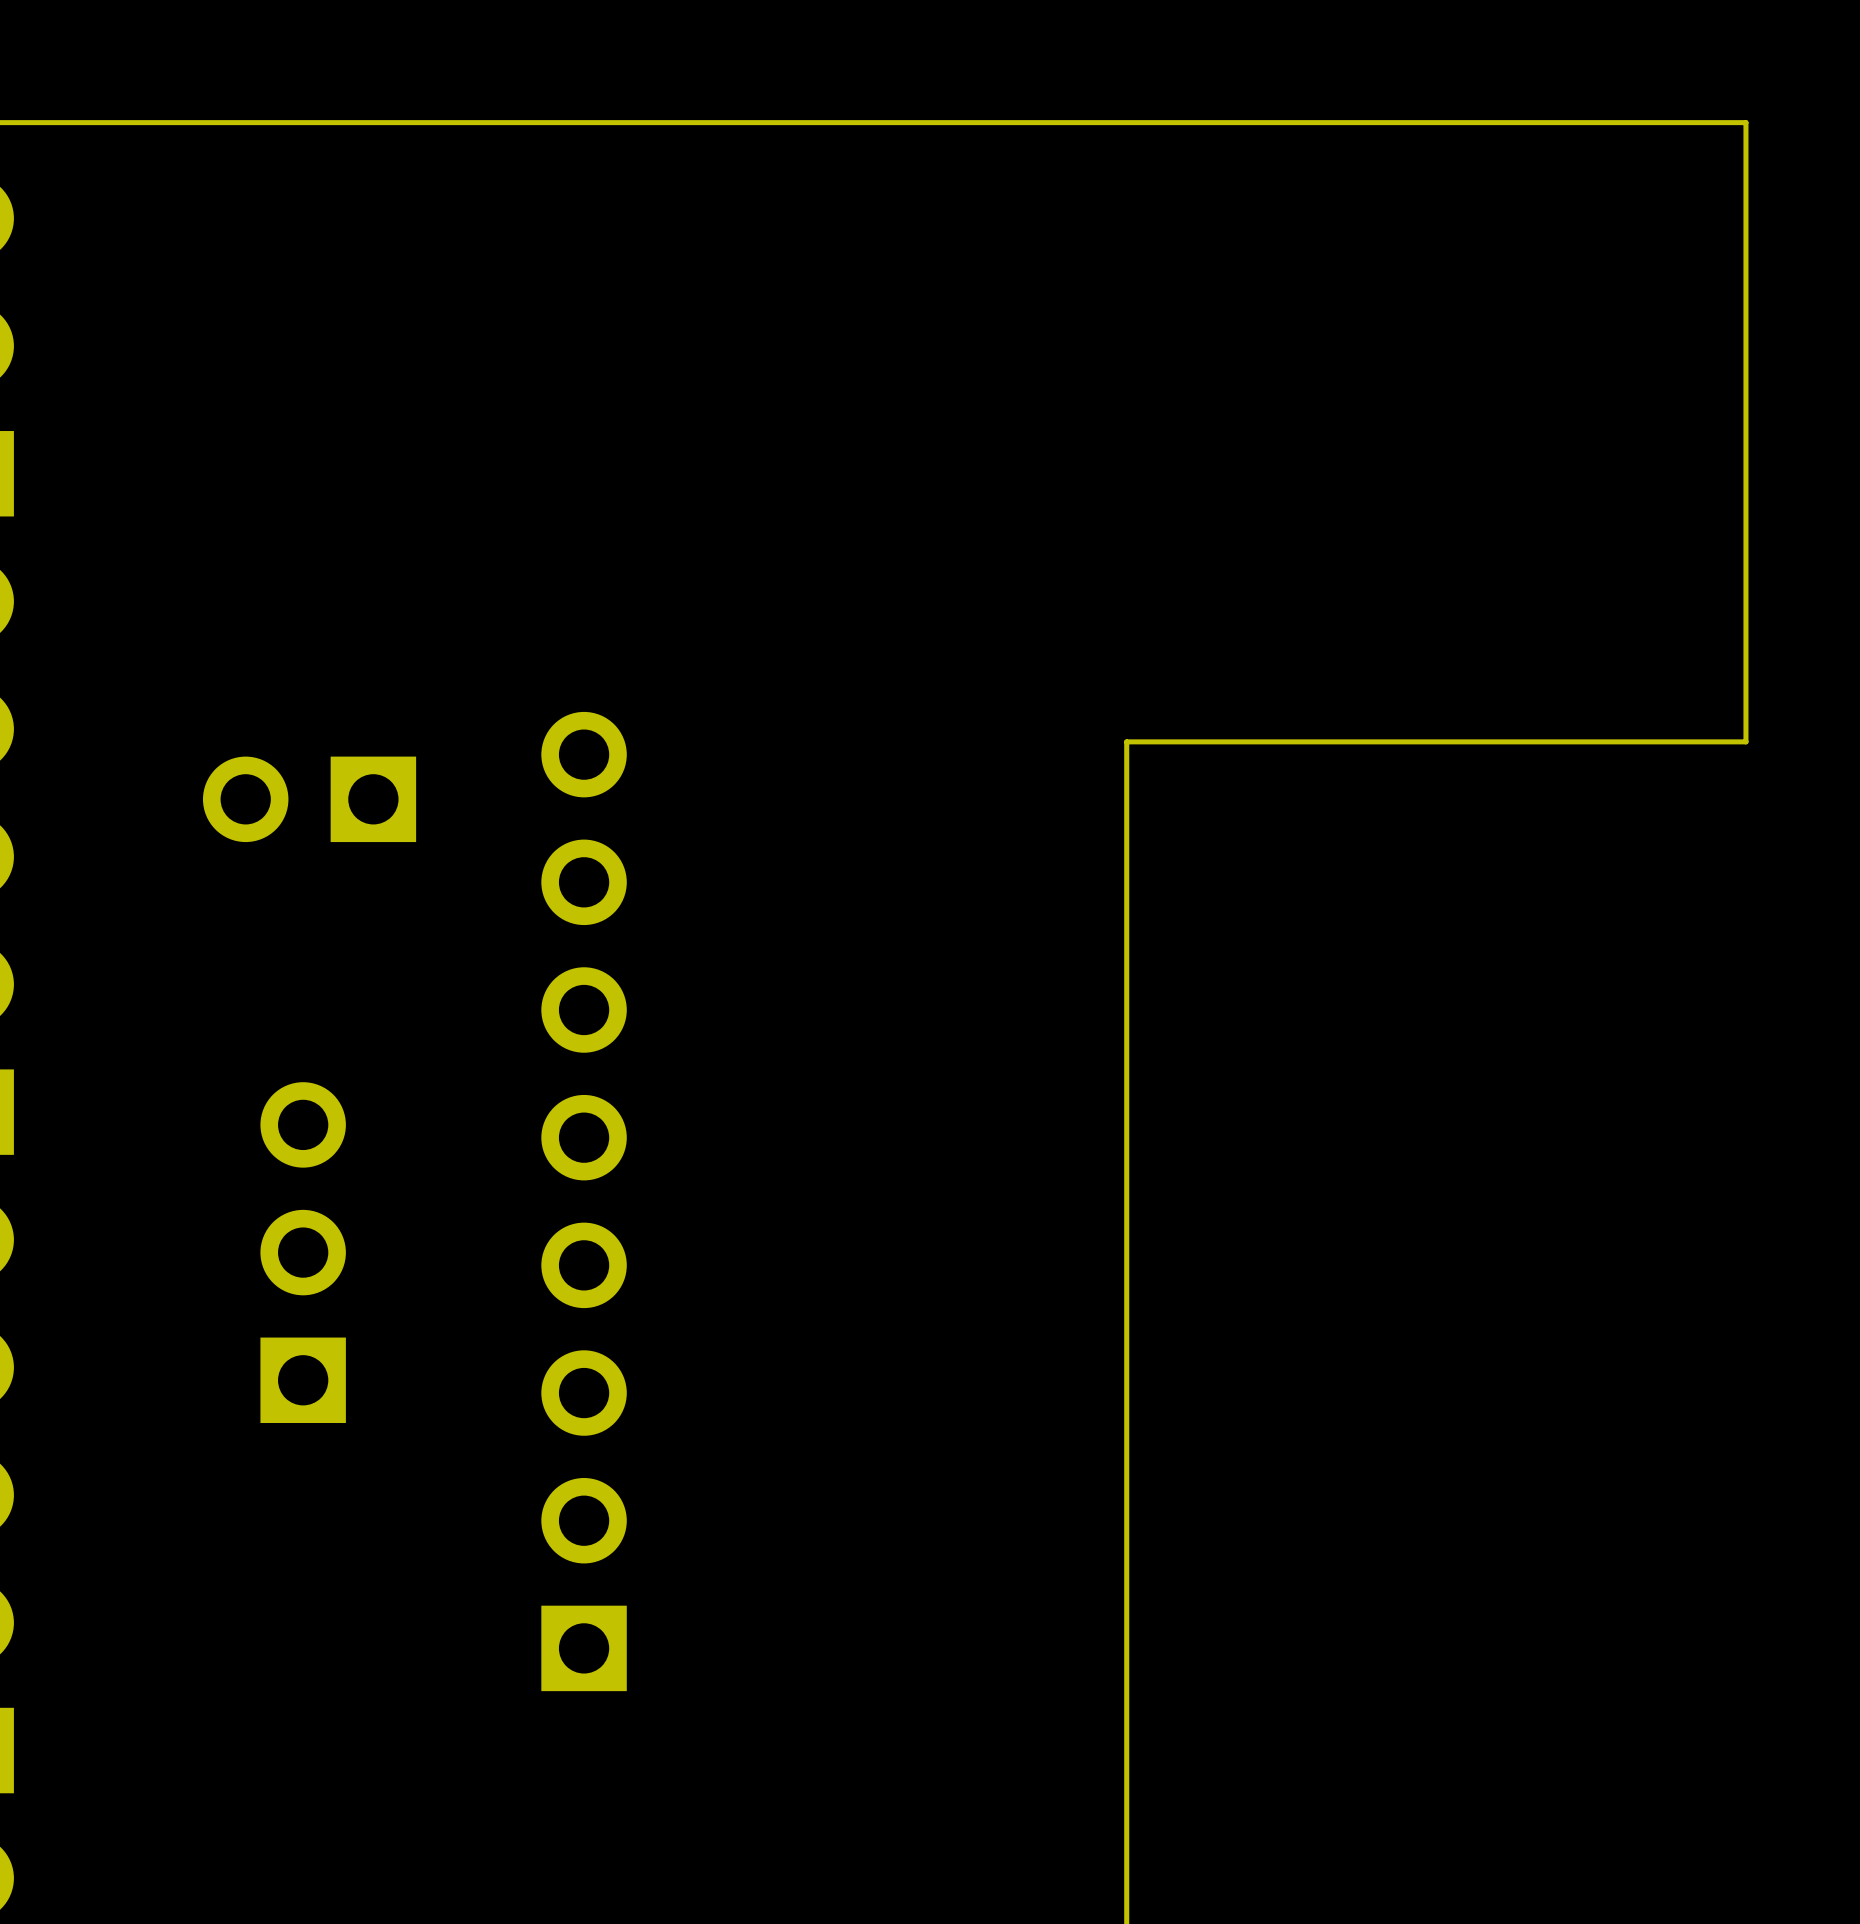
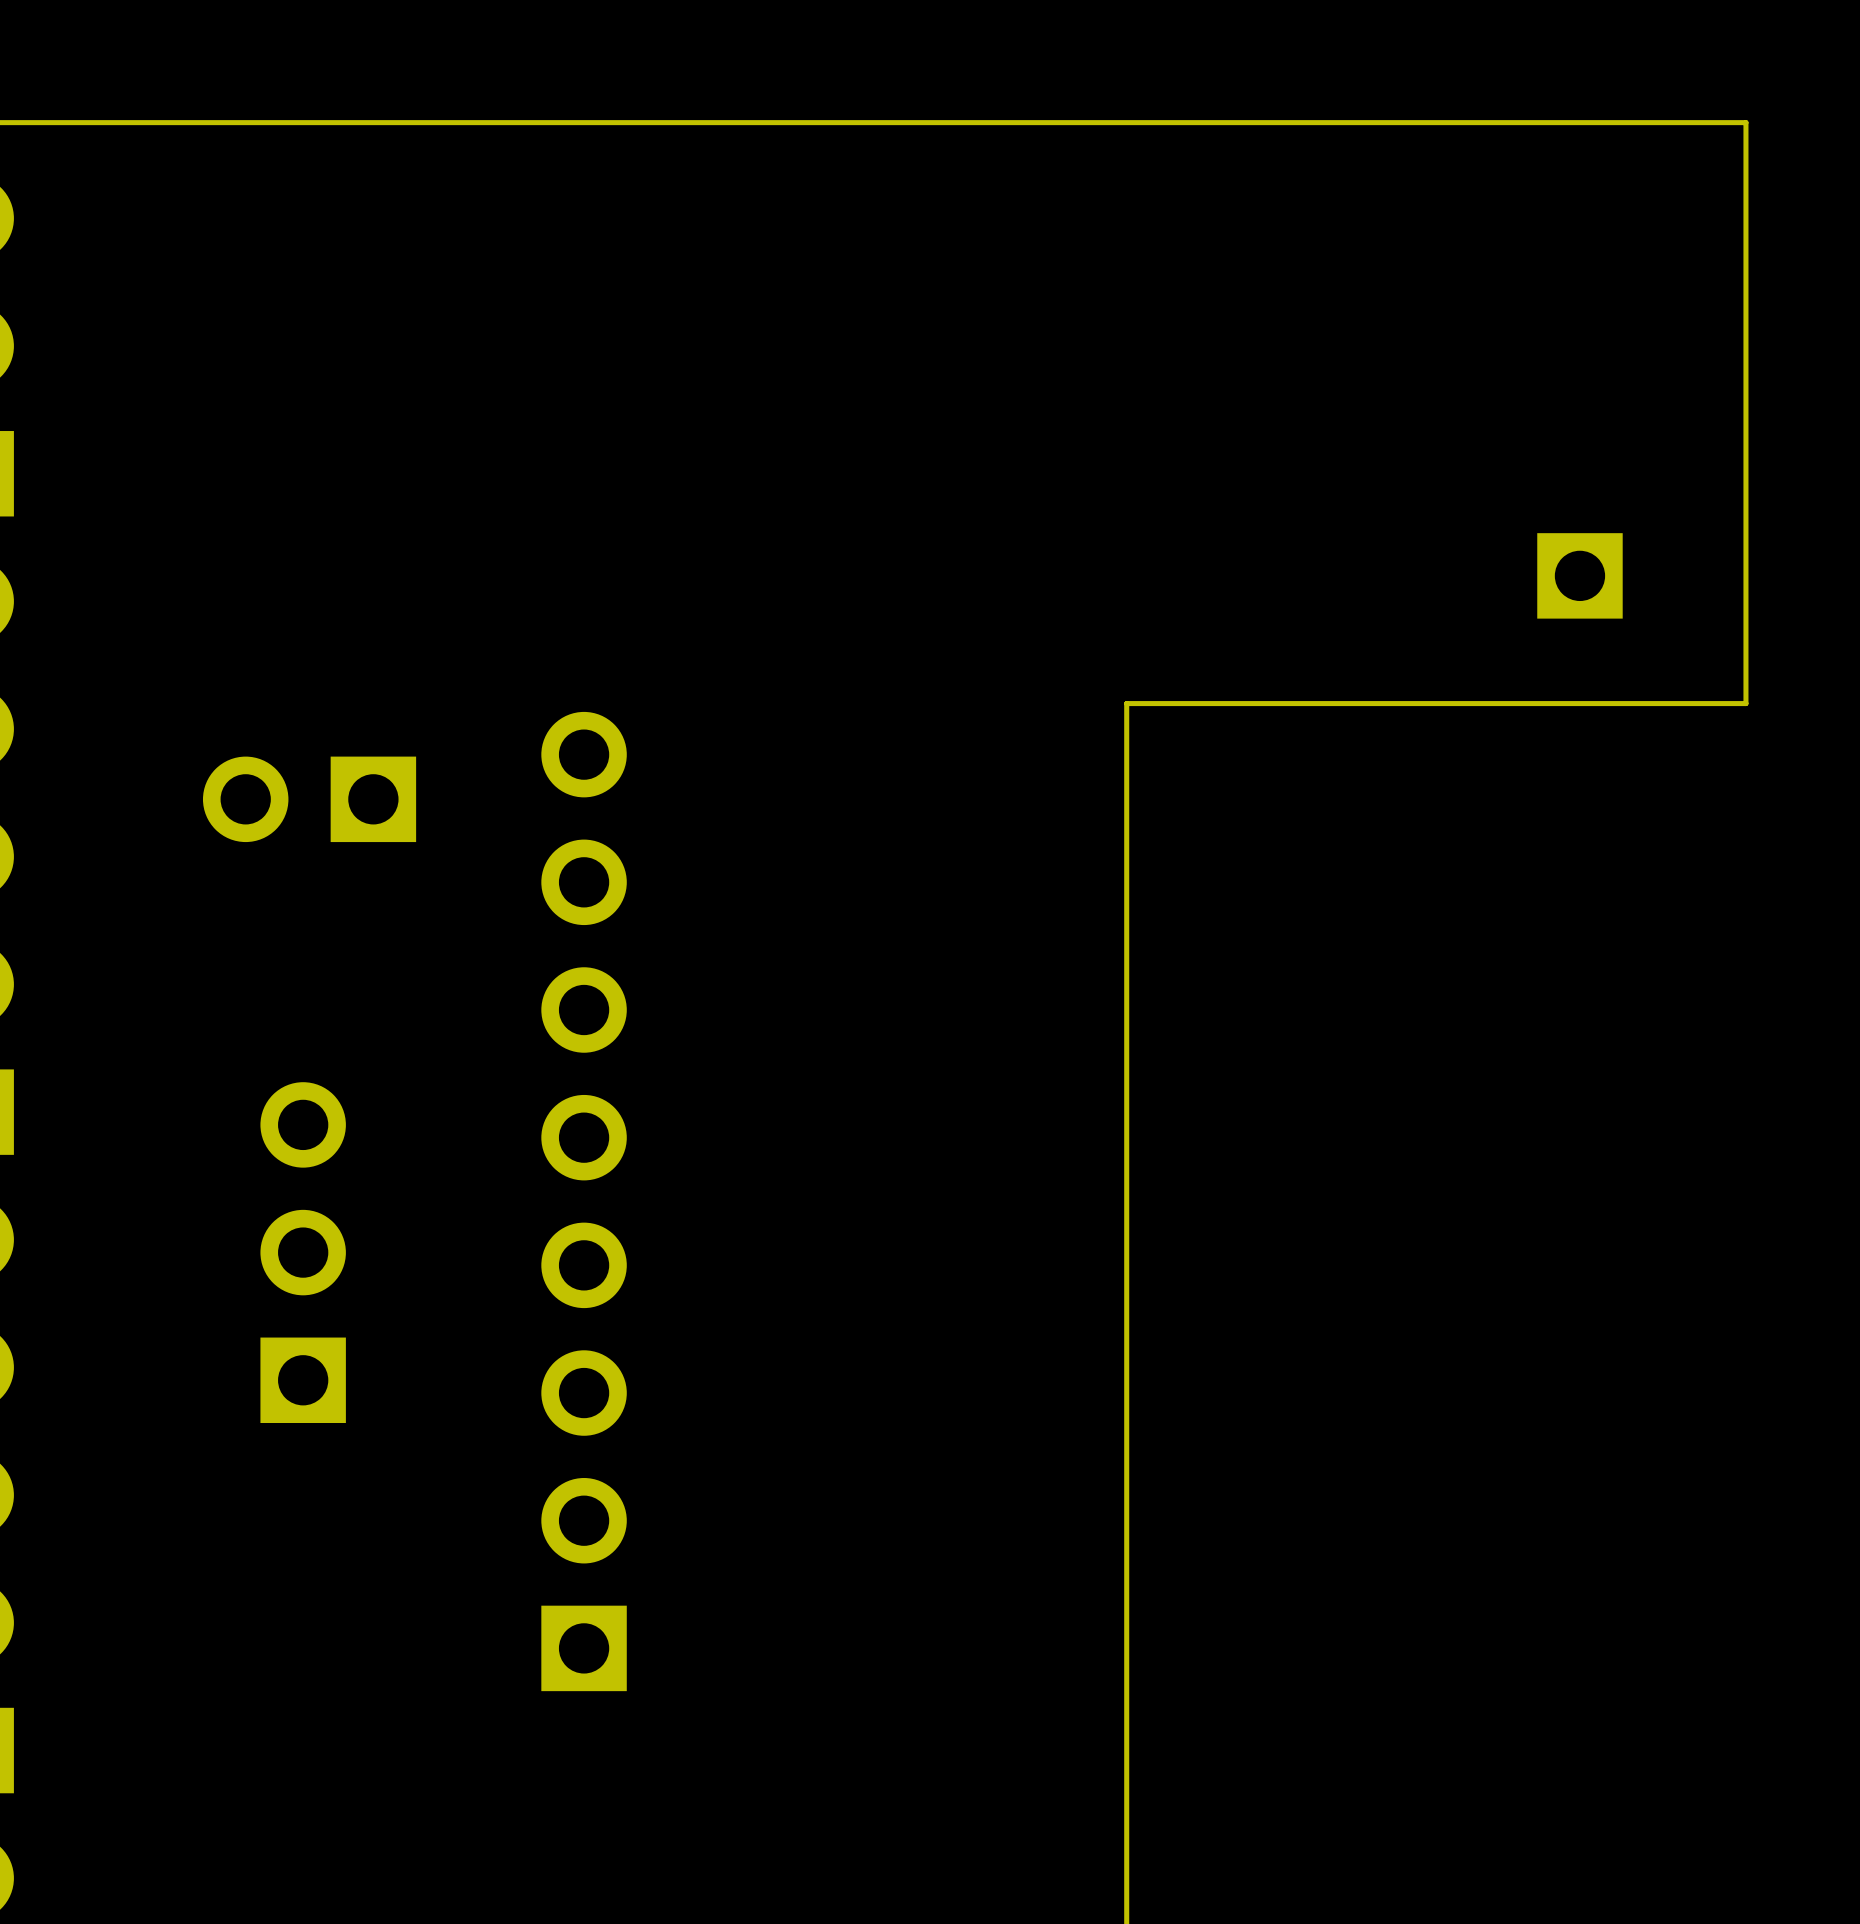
part: none -> (1579, 575)
board edge: (1745, 703) (1745, 741) (1126, 741) -> (1745, 703) (1126, 703) (1126, 741)

